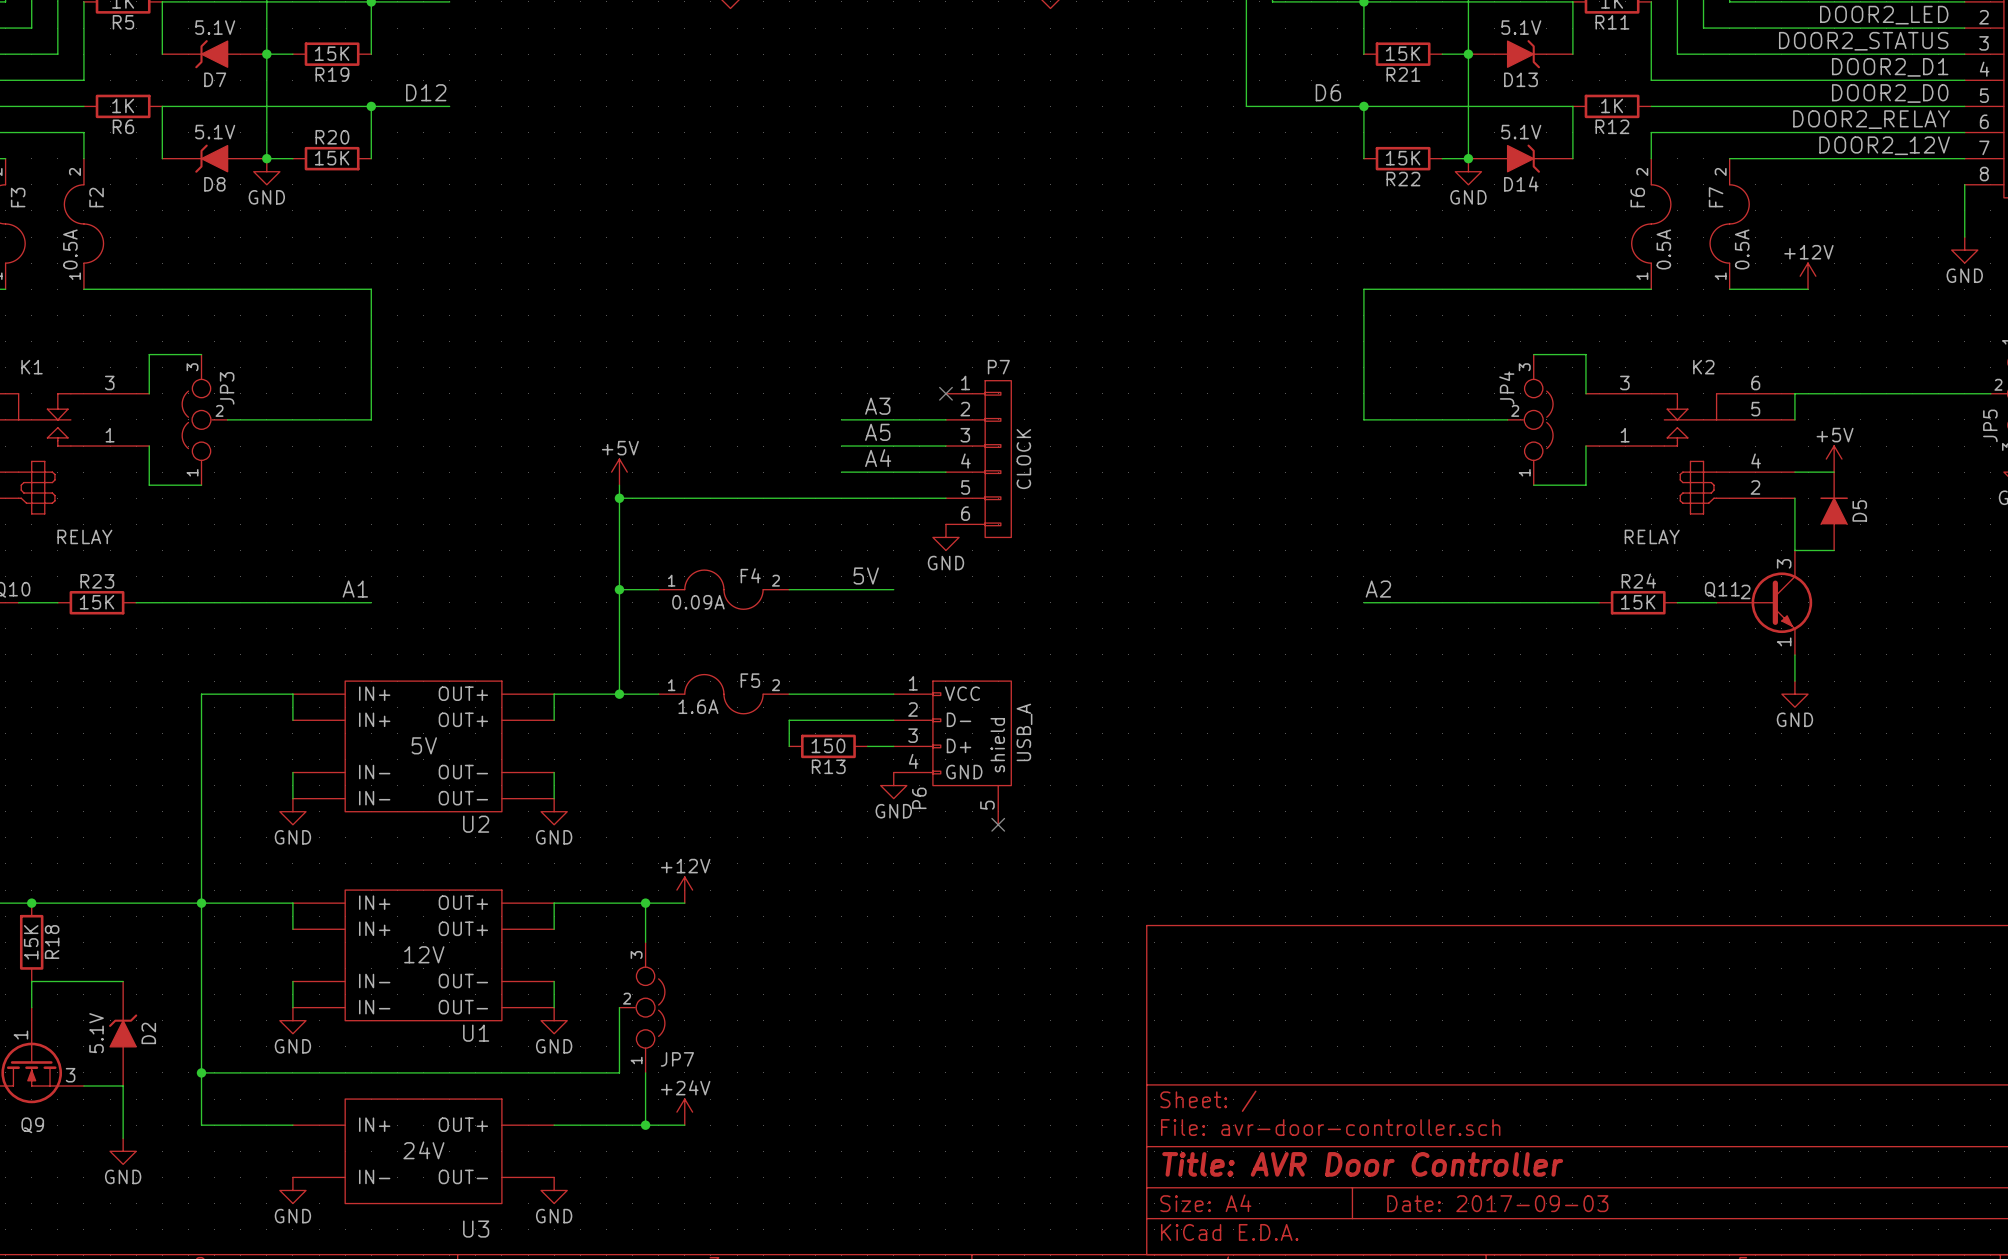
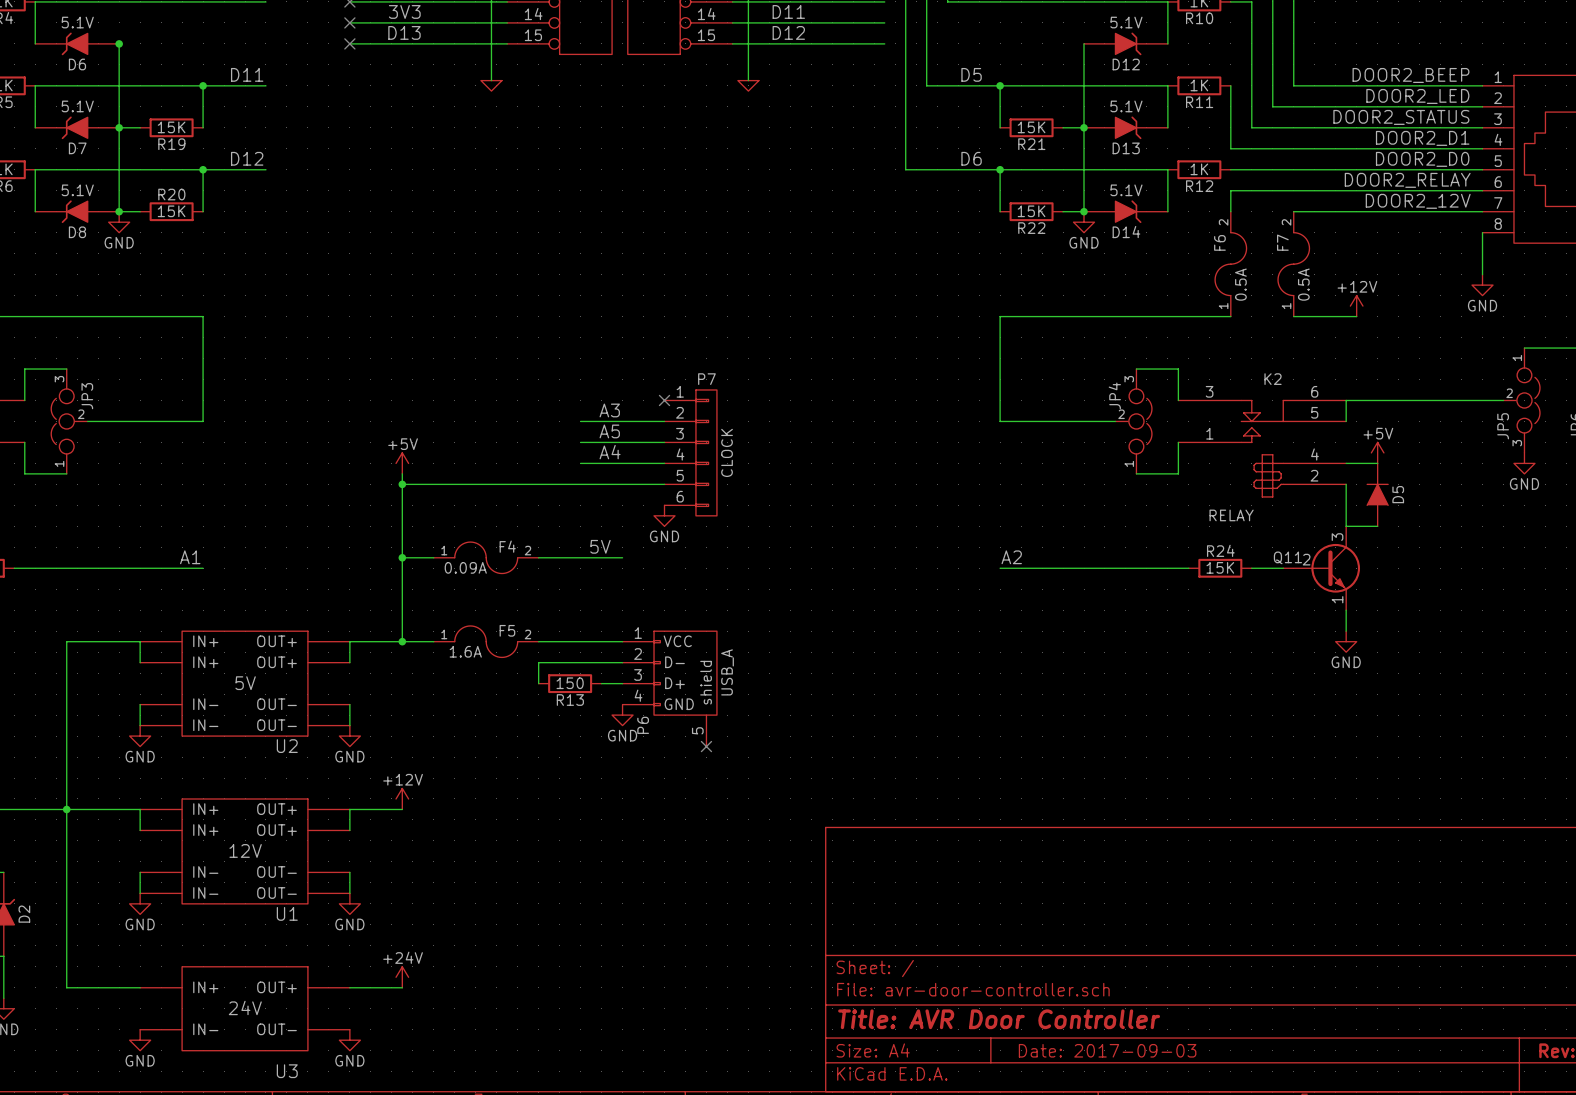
power symbol position: +12V (684, 890) -> +12V (402, 798)
wire: (619, 903) (684, 903) -> none
wire: (645, 903) (645, 942) -> none
junction: (645, 903) -> none
wire: (619, 1007) (619, 1072) (201, 1072) -> none
JP7: (642, 1007) -> none
junction: (201, 1072) -> none
wire: (645, 1072) (645, 1125) -> none
power symbol position: +24V (684, 1112) -> +24V (402, 977)
wire: (619, 1125) (684, 1125) -> none
junction: (645, 1125) -> none

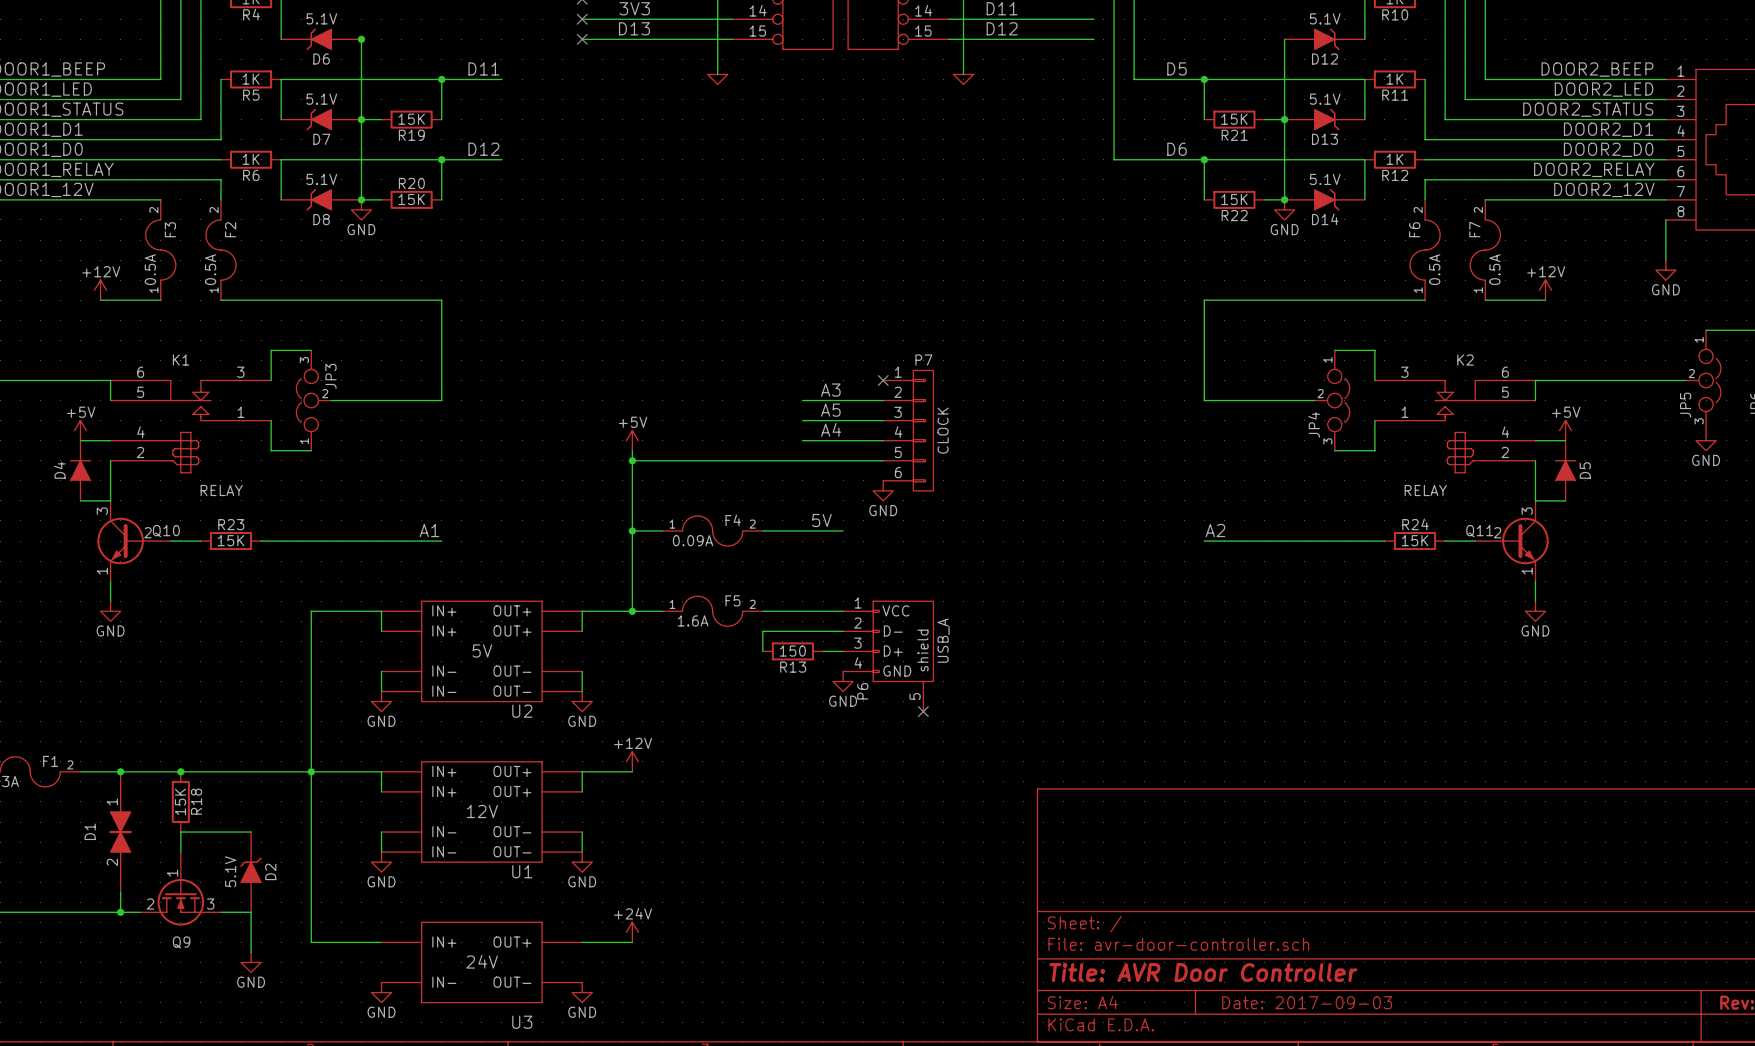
JP4 flip: as is (1140, 421) -> up-down (1338, 400)

